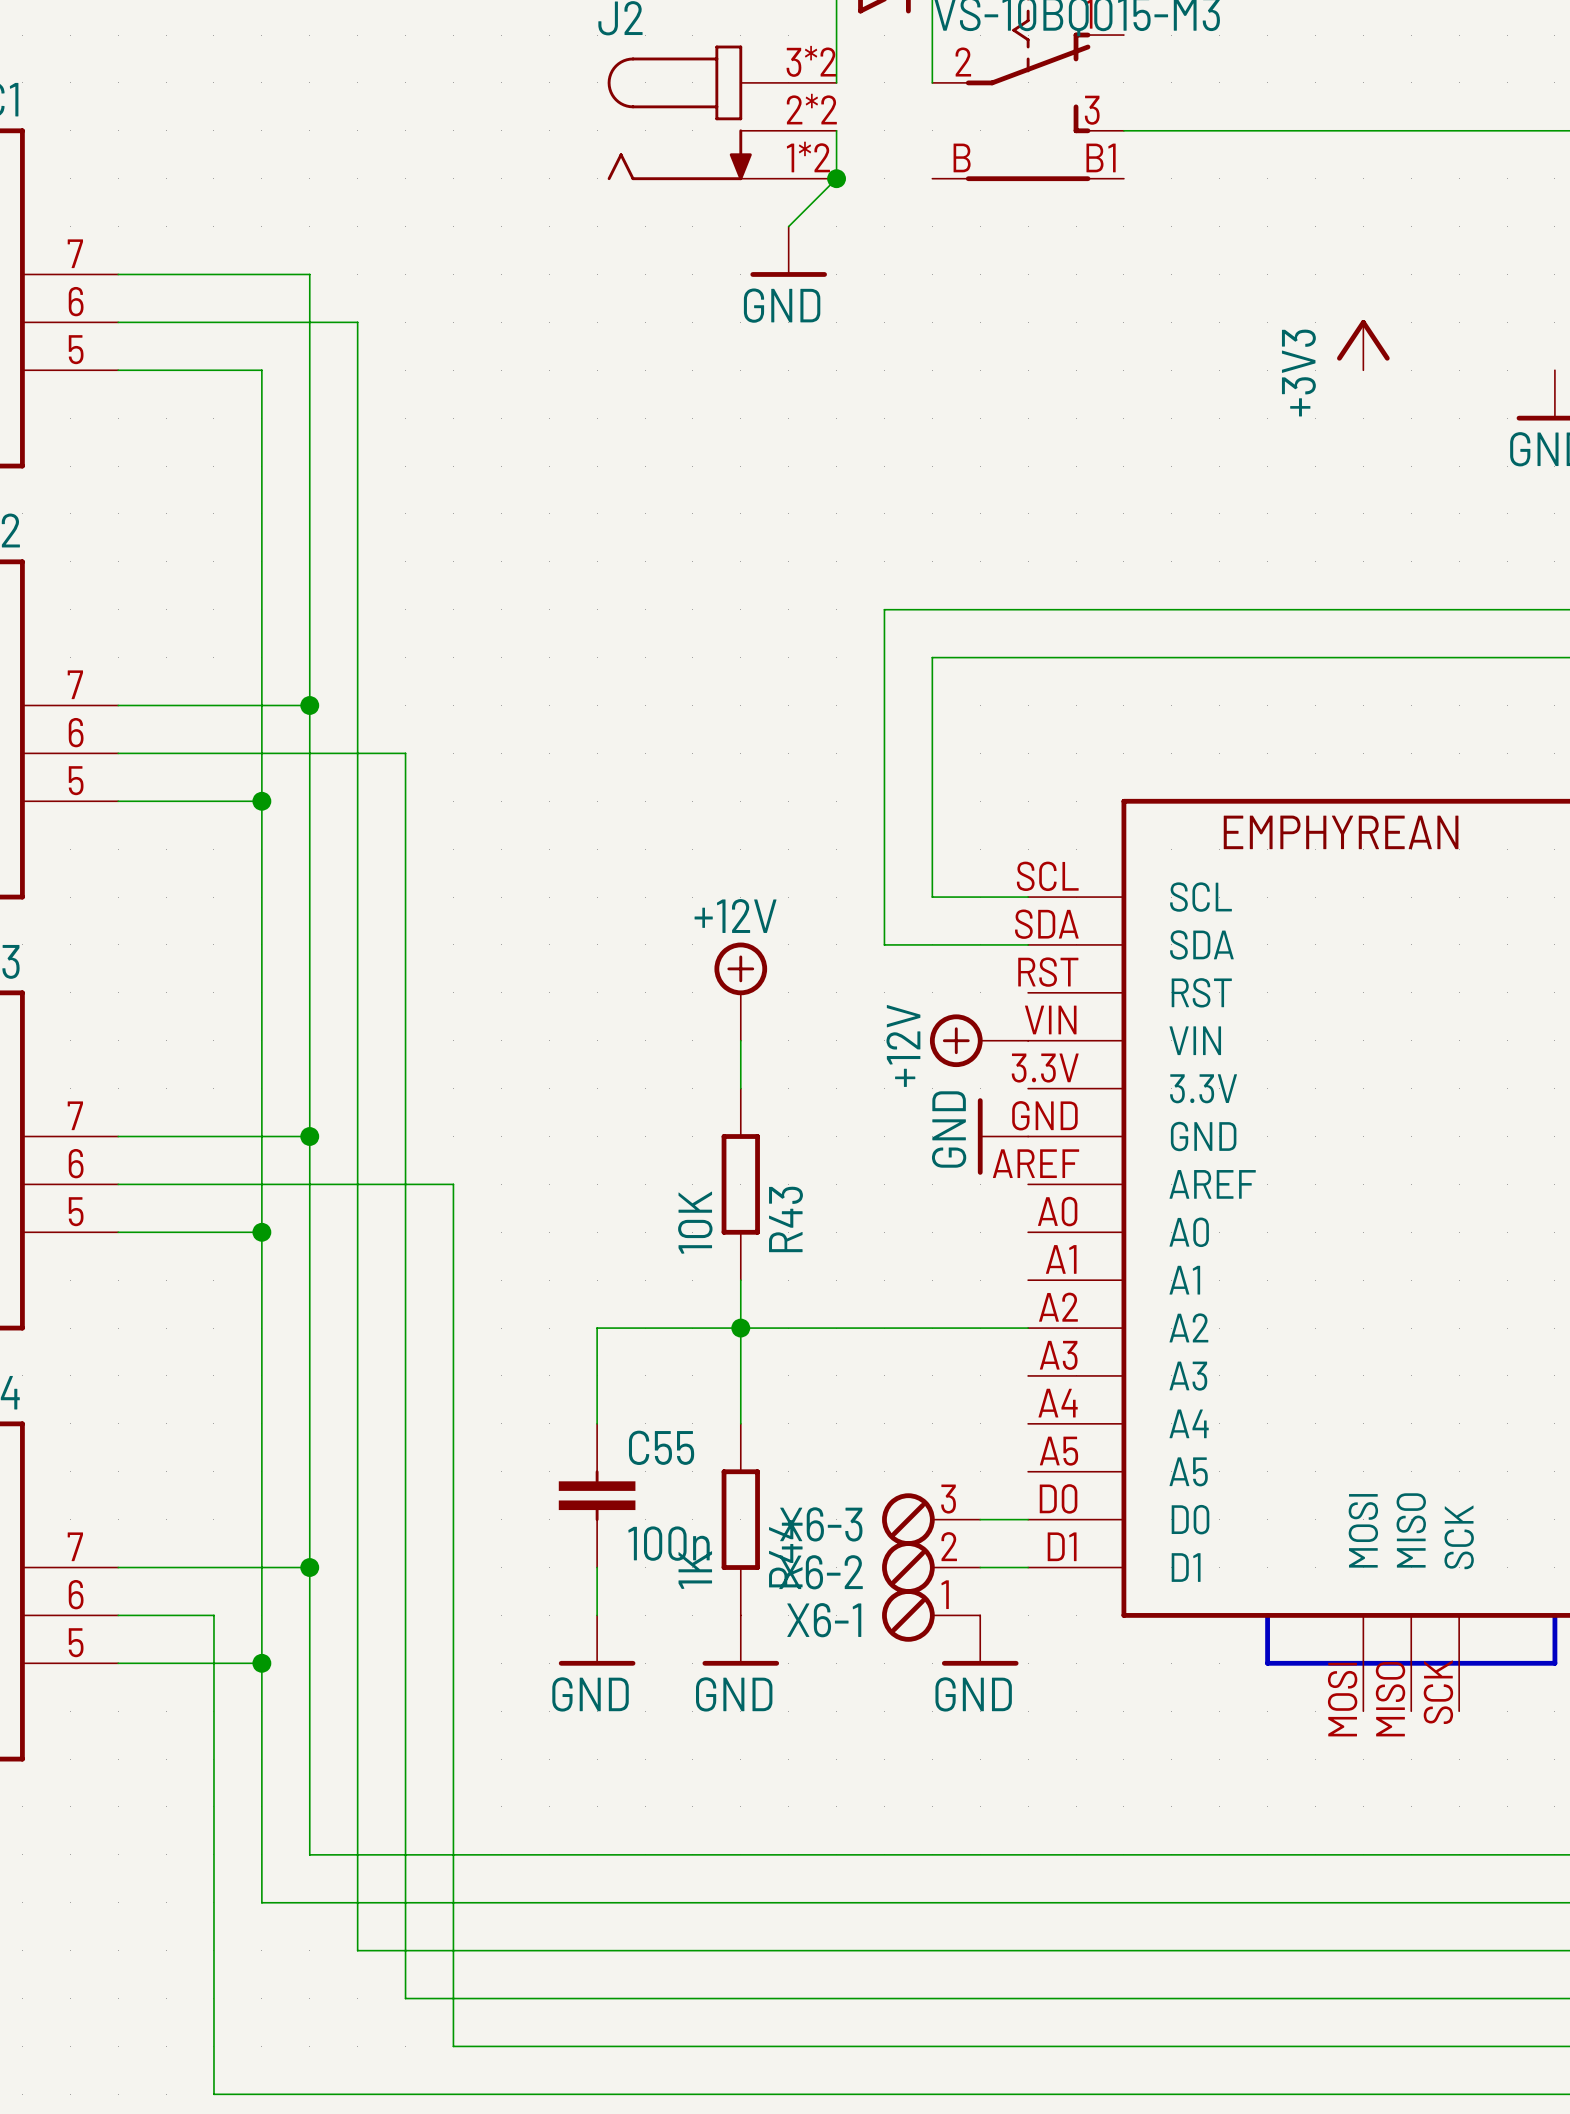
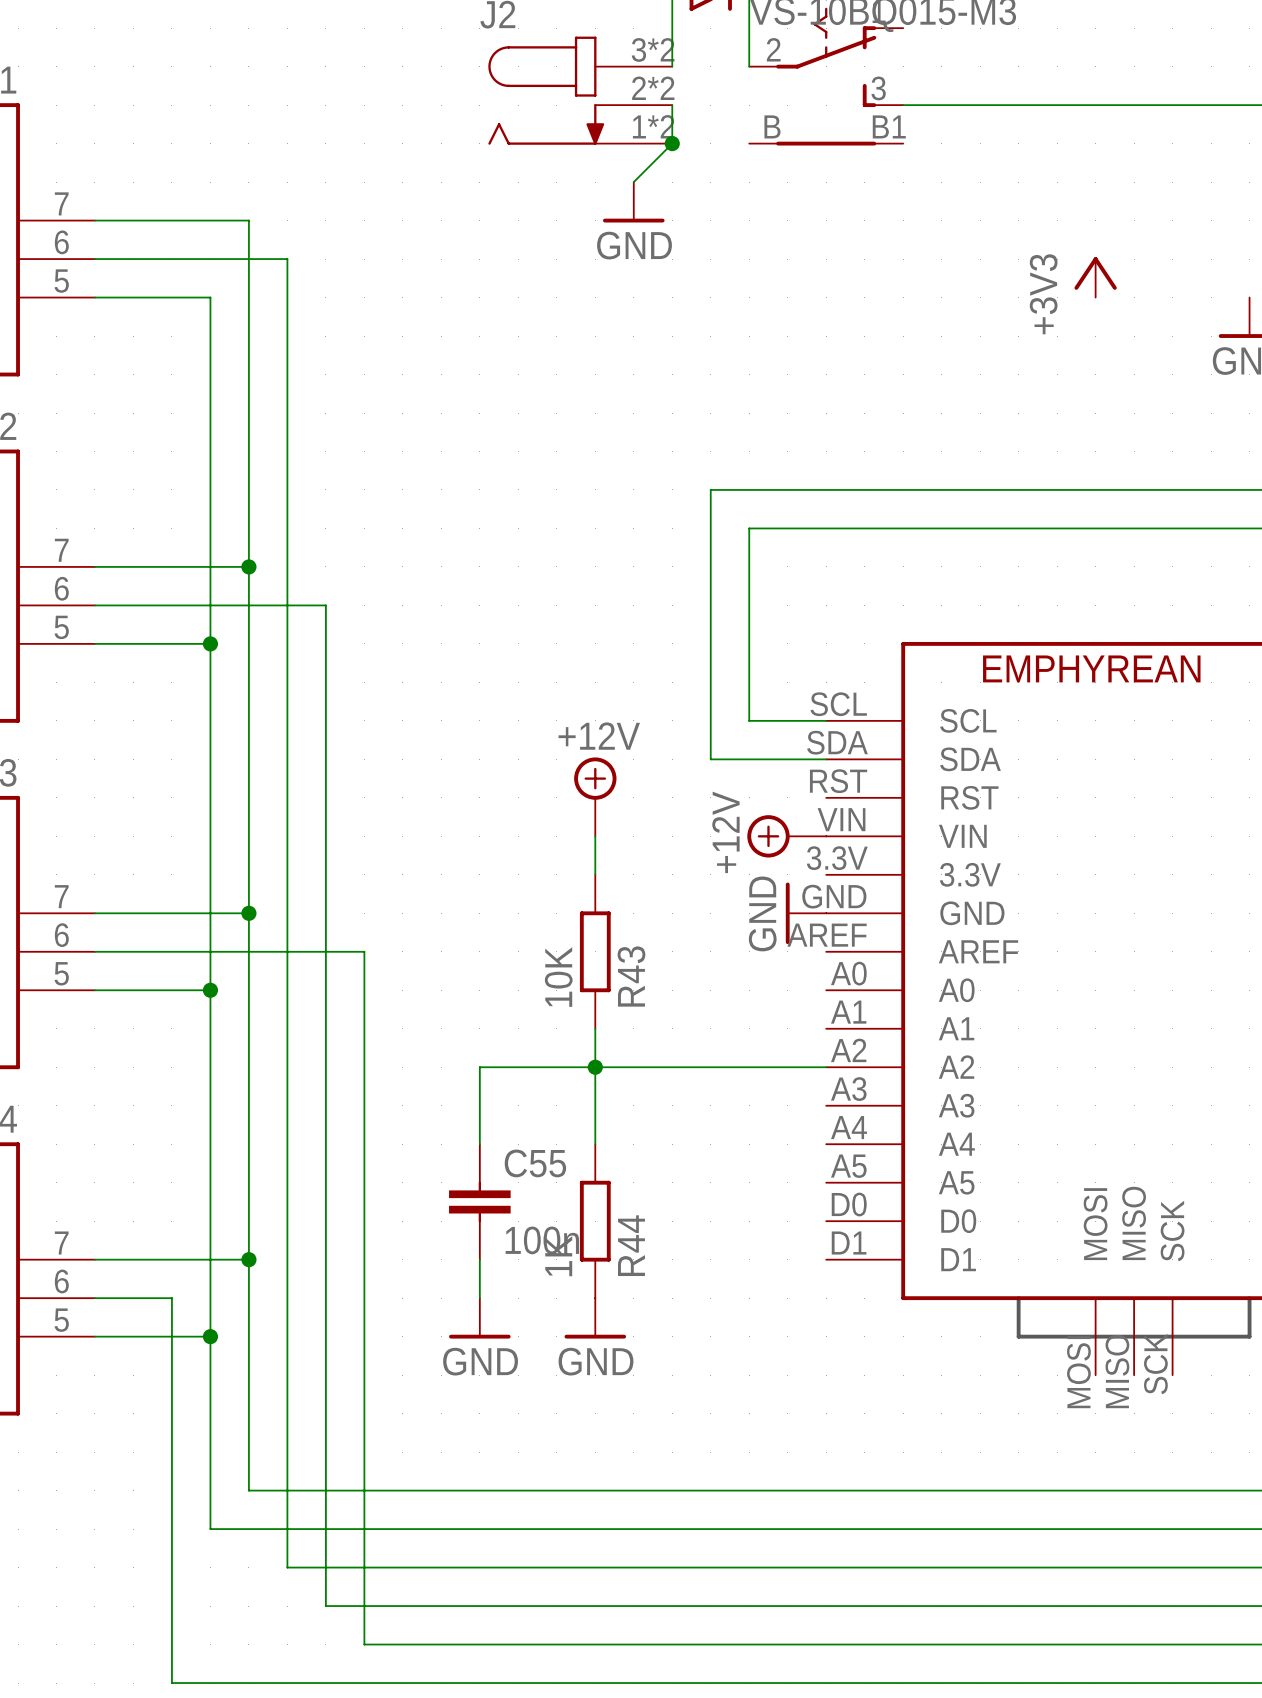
X6-3: (931, 1519) -> none
wire: (980, 1519) (1028, 1519) -> none
X6-2: (931, 1567) -> none
wire: (980, 1567) (1028, 1567) -> none
X6-1: (931, 1615) -> none
power symbol: GND (980, 1640) -> none

